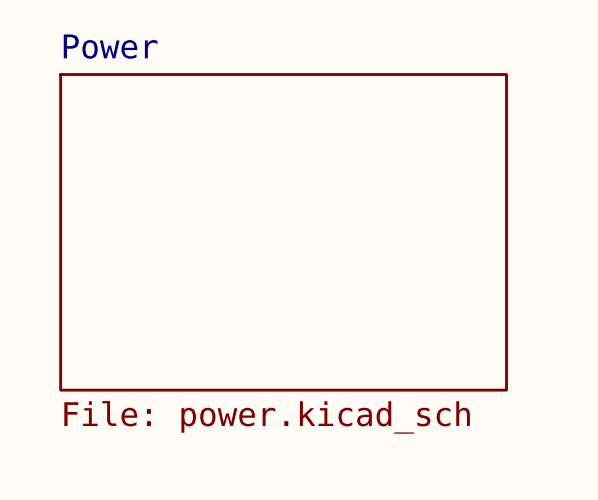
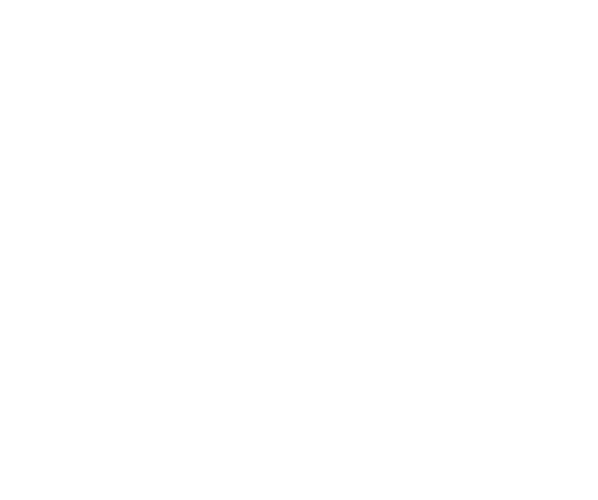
sheet Power: File: power.kicad_sch (283, 232) -> none

